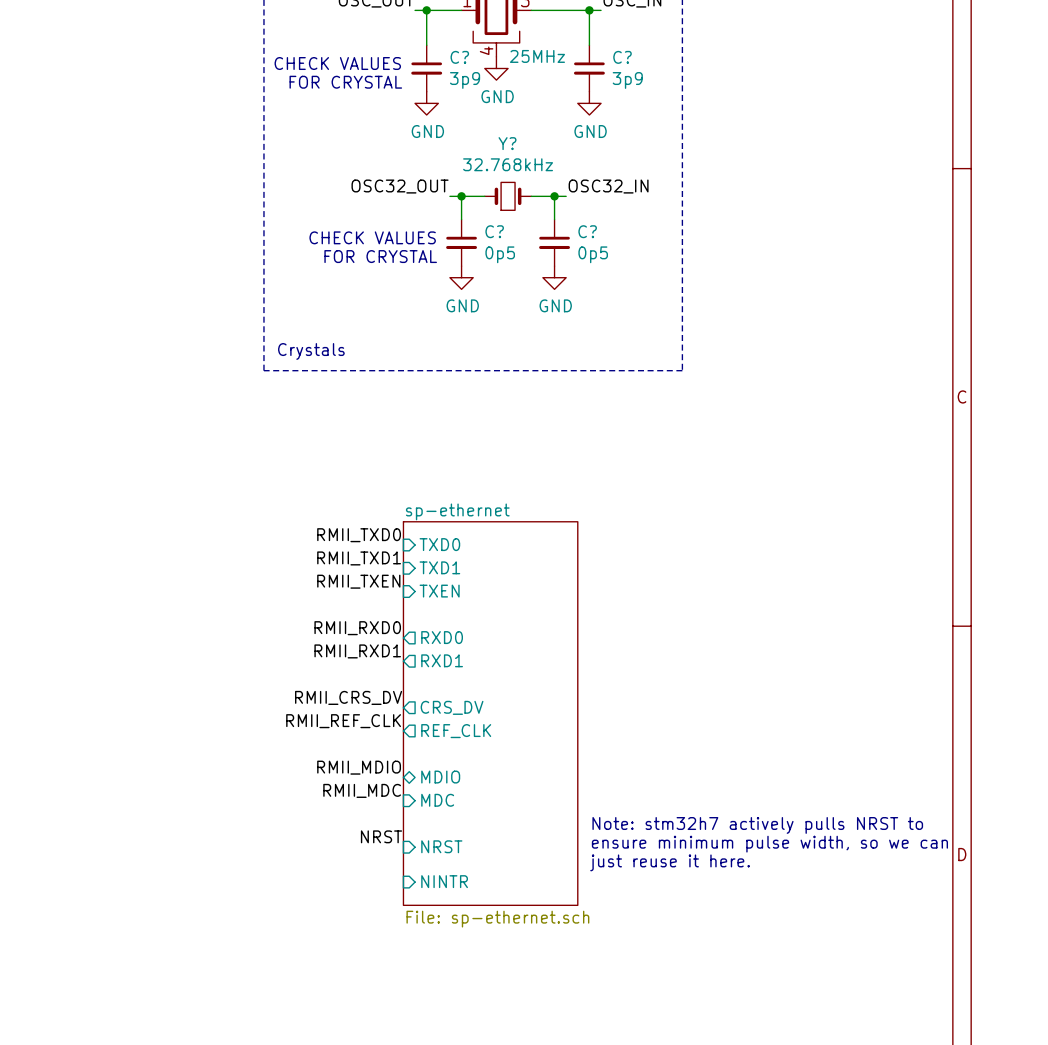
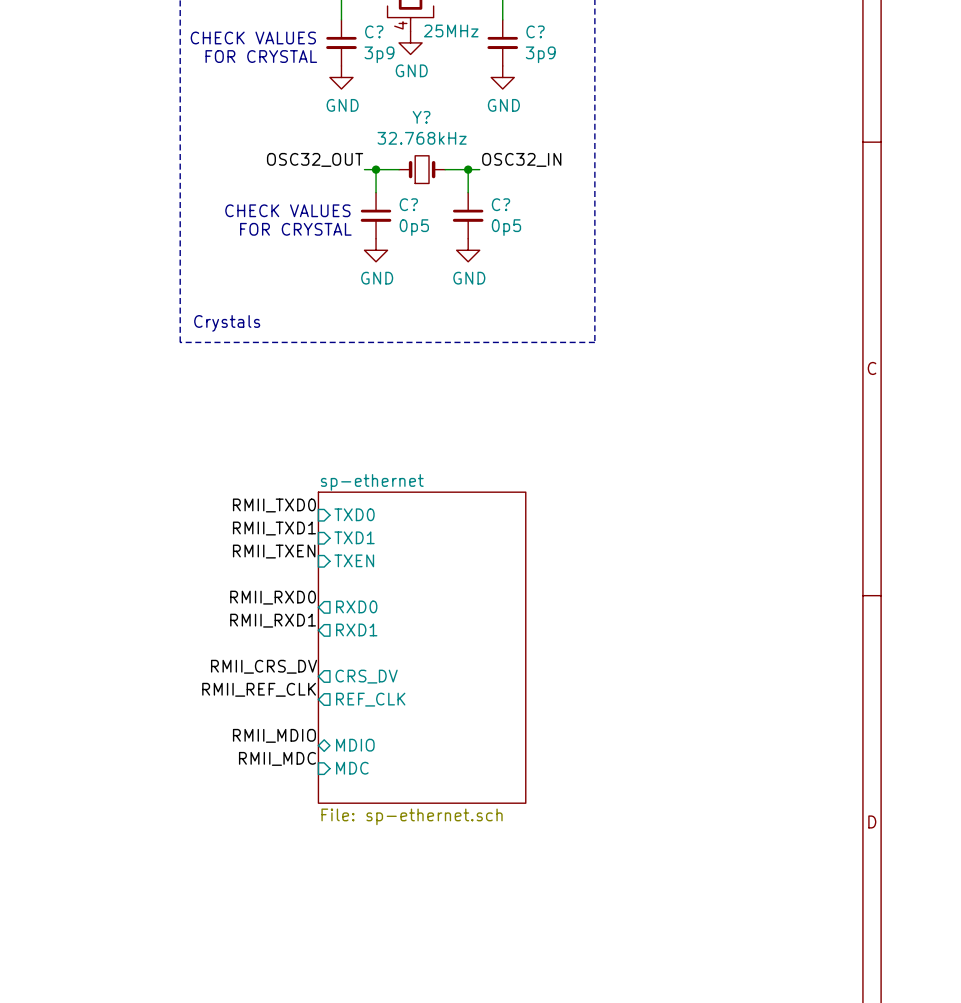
sheet sp-ethernet: none -> File: sp-ethernet.sch (422, 647)
sheet sp-ethernet: File: sp-ethernet.sch (490, 713) -> none
text: Note: stm32h7 actively pulls NRST to (757, 825) -> none
label: NRST (381, 836) -> none
text: ensure minimum pulse width, so we can (769, 844) -> none
sheet pin: NRST (441, 846) -> none
text: just reuse it here. (670, 862) -> none
sheet pin: NINTR (444, 881) -> none

